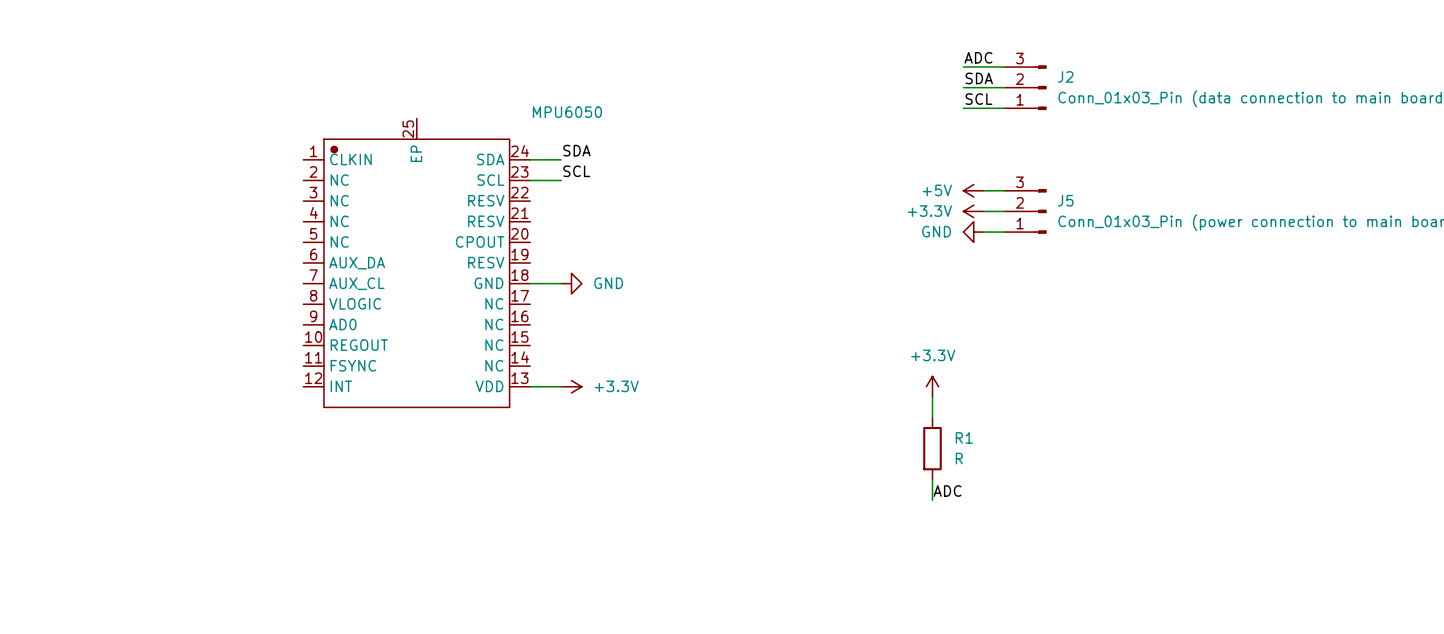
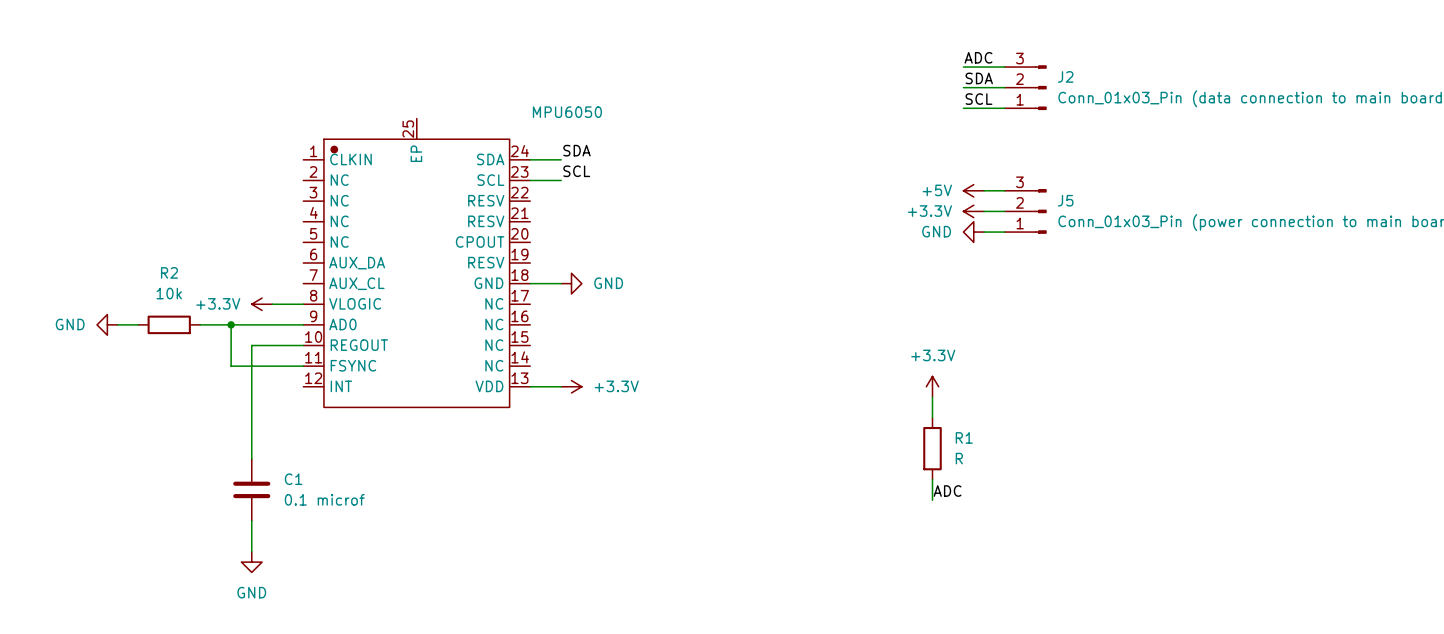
power symbol: none -> +3.3V (262, 304)
wire: none -> (272, 304) (303, 304)
power symbol: none -> GND (107, 324)
wire: none -> (117, 324) (138, 324)
R2: none -> 10k (169, 324)
wire: none -> (200, 324) (303, 324)
wire: none -> (231, 324) (231, 366) (303, 366)
junction: none -> (231, 324)
wire: none -> (303, 345) (251, 345) (251, 458)
C1: none -> 0.1 microf (251, 489)
wire: none -> (251, 520) (251, 551)
power symbol: none -> GND (251, 562)

